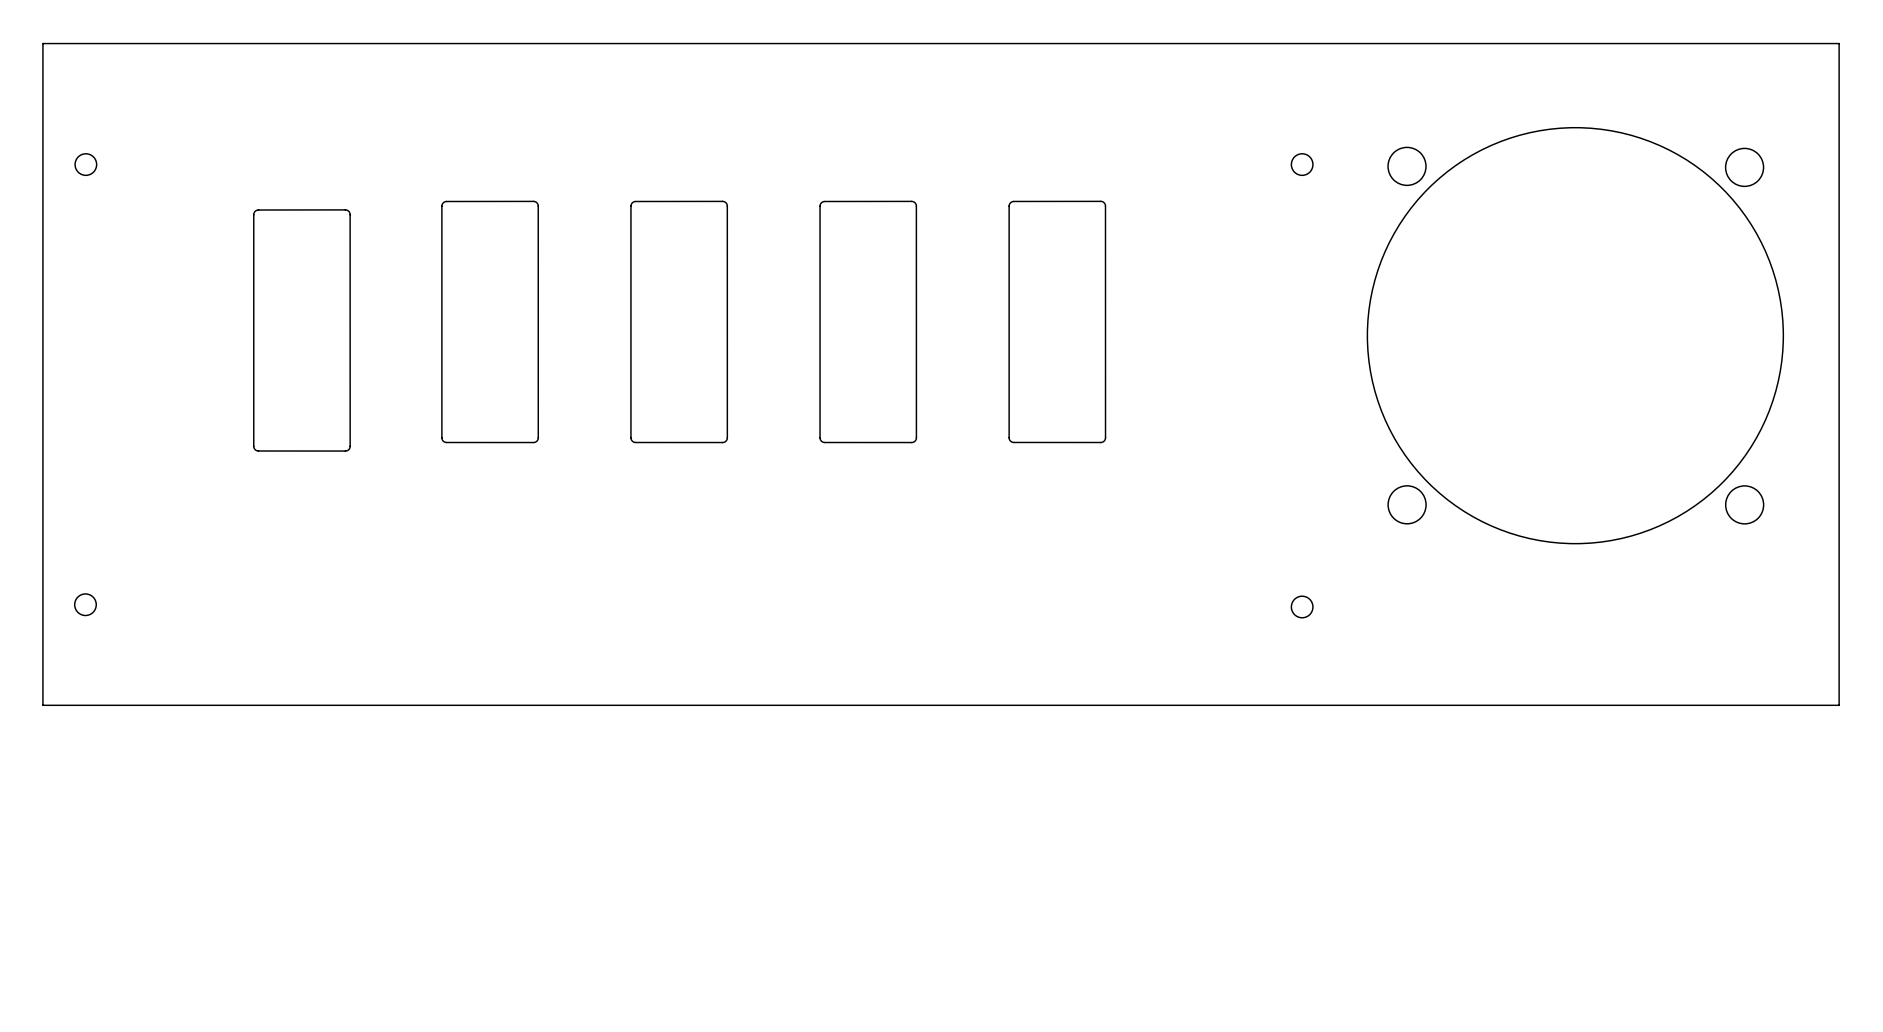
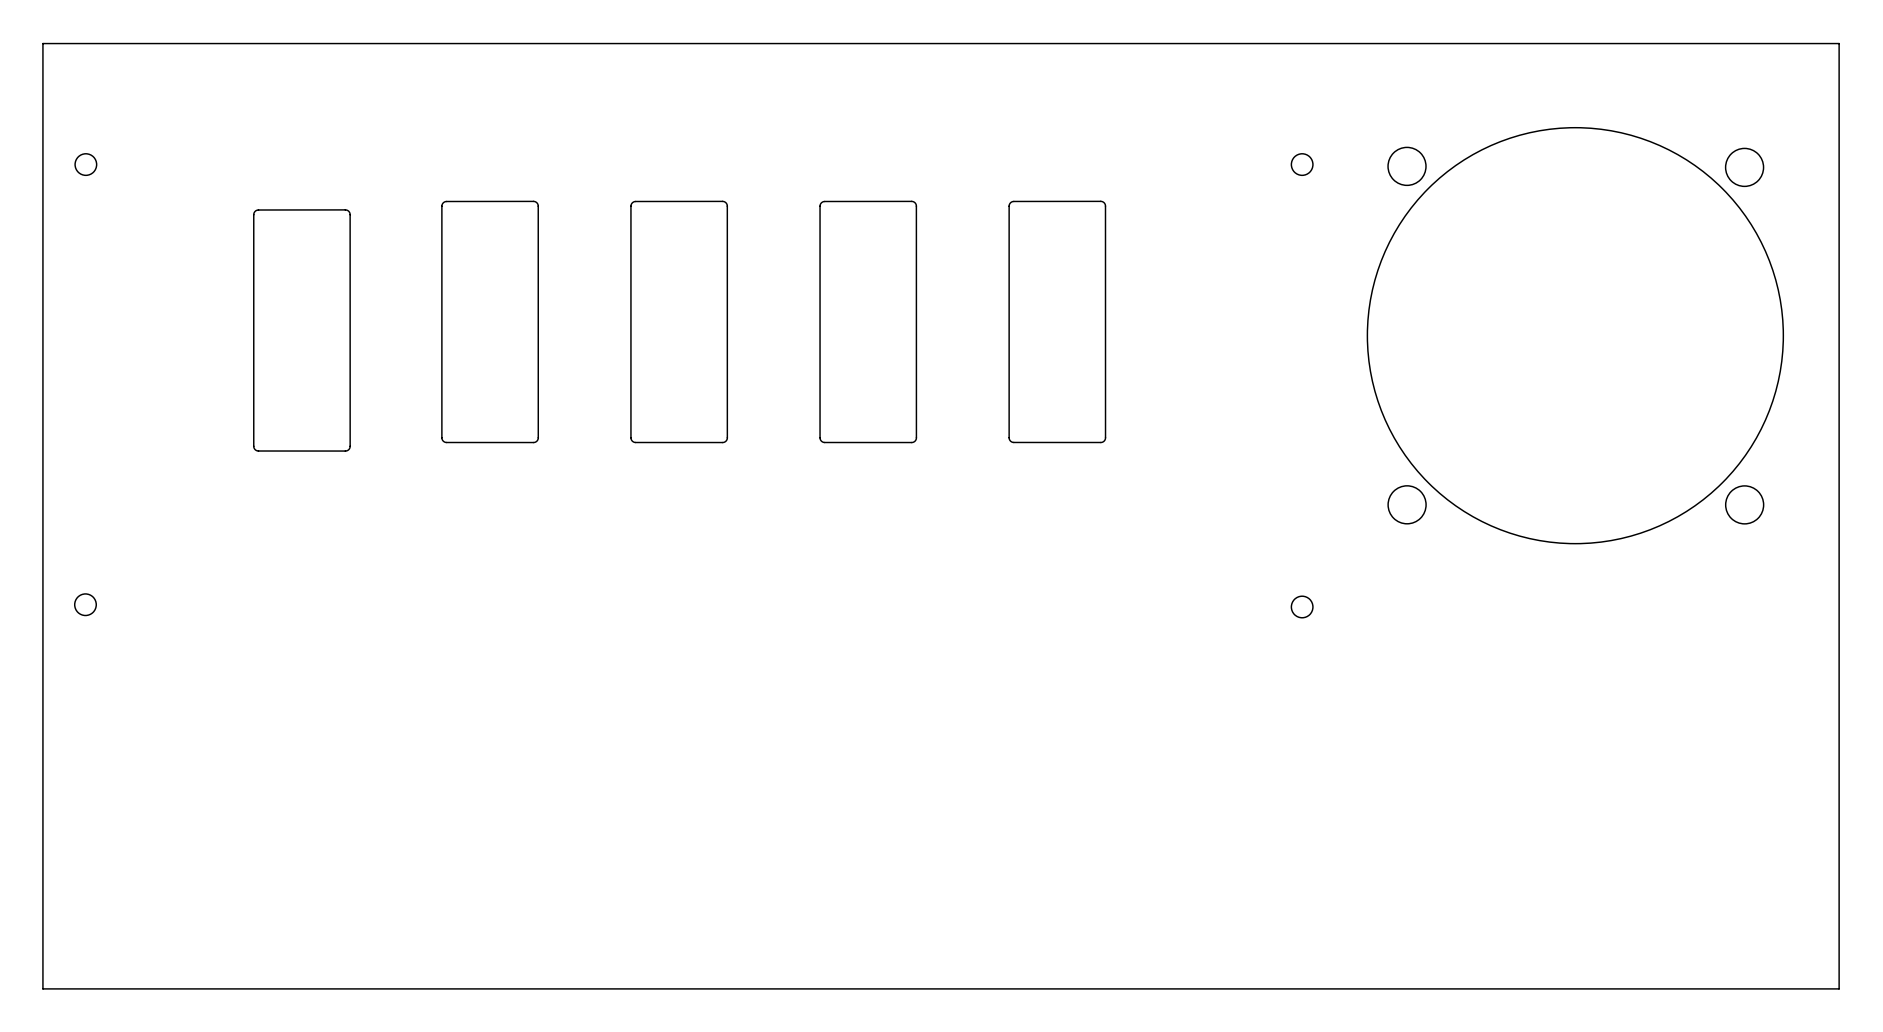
board edge: (1839, 705) (42, 705) -> (1839, 705) (1839, 988) (42, 988) (42, 705)

